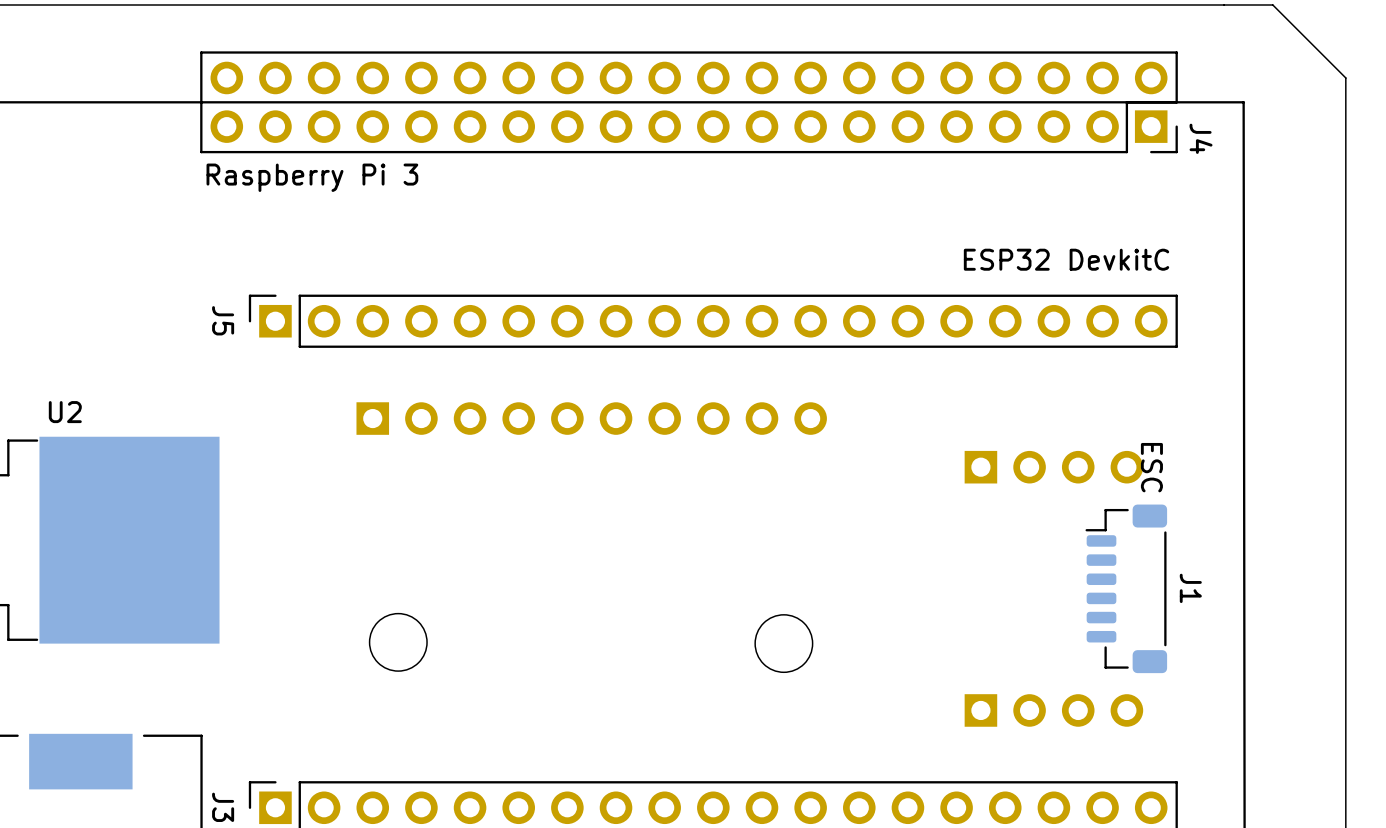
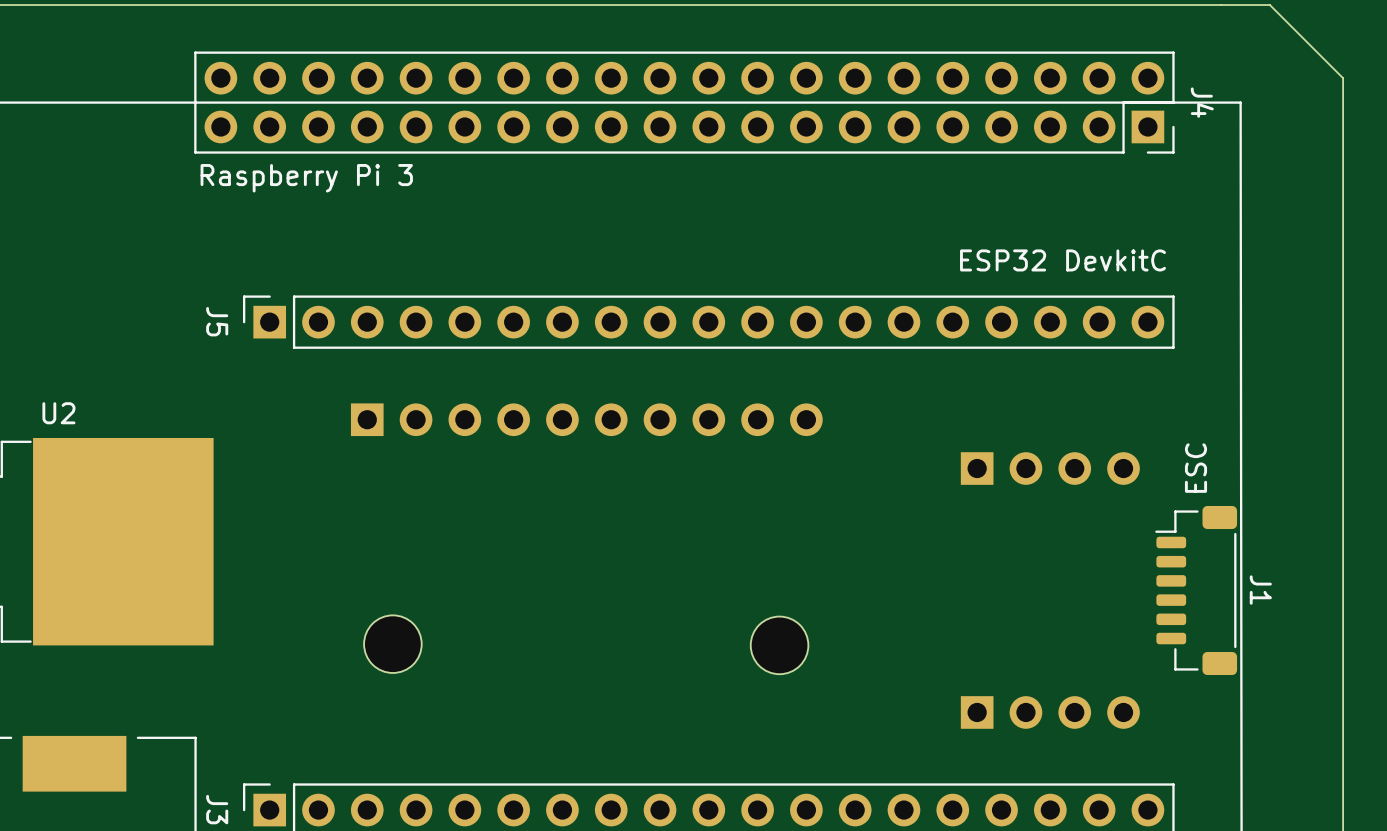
J4 name position: J4 (1201, 138) -> J4 (1202, 102)
text rotation: 0° (1151, 467) -> 180° (1196, 468)
J1 position: (1126, 588) -> (1196, 590)

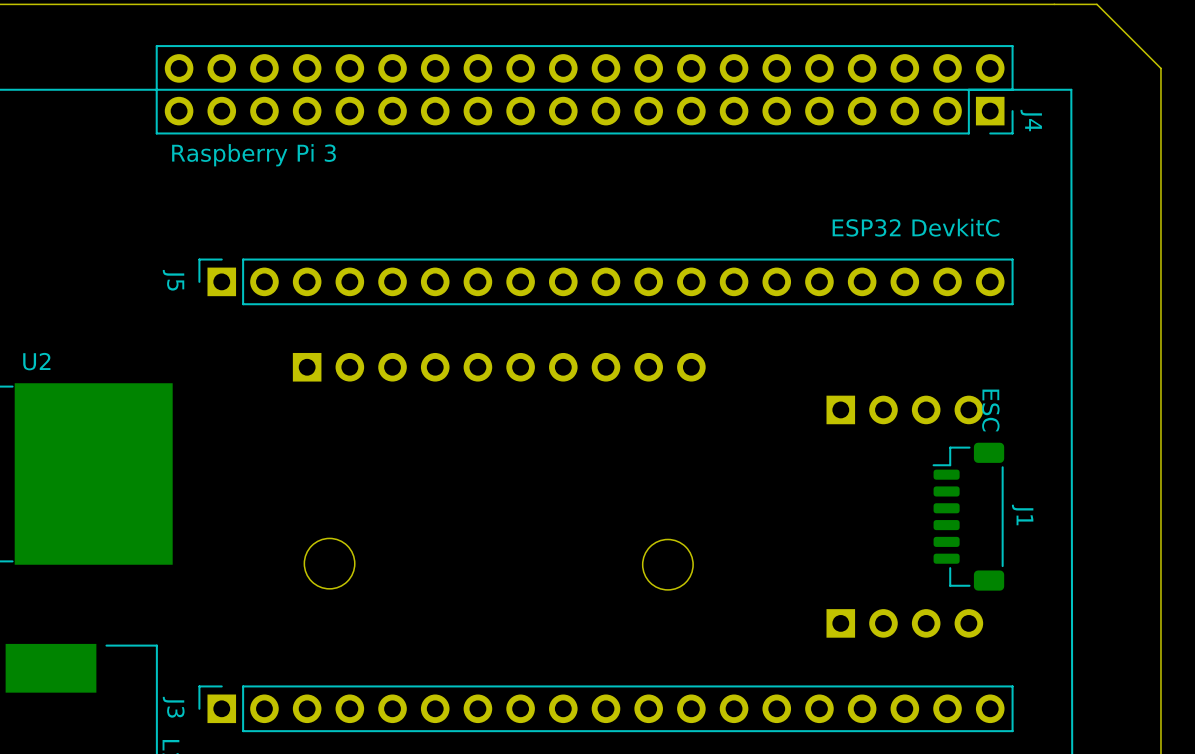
J4 name position: J4 (1202, 102) -> J4 (1031, 120)
text rotation: 0° (1196, 468) -> 180° (990, 410)
J1 position: (1196, 590) -> (968, 516)

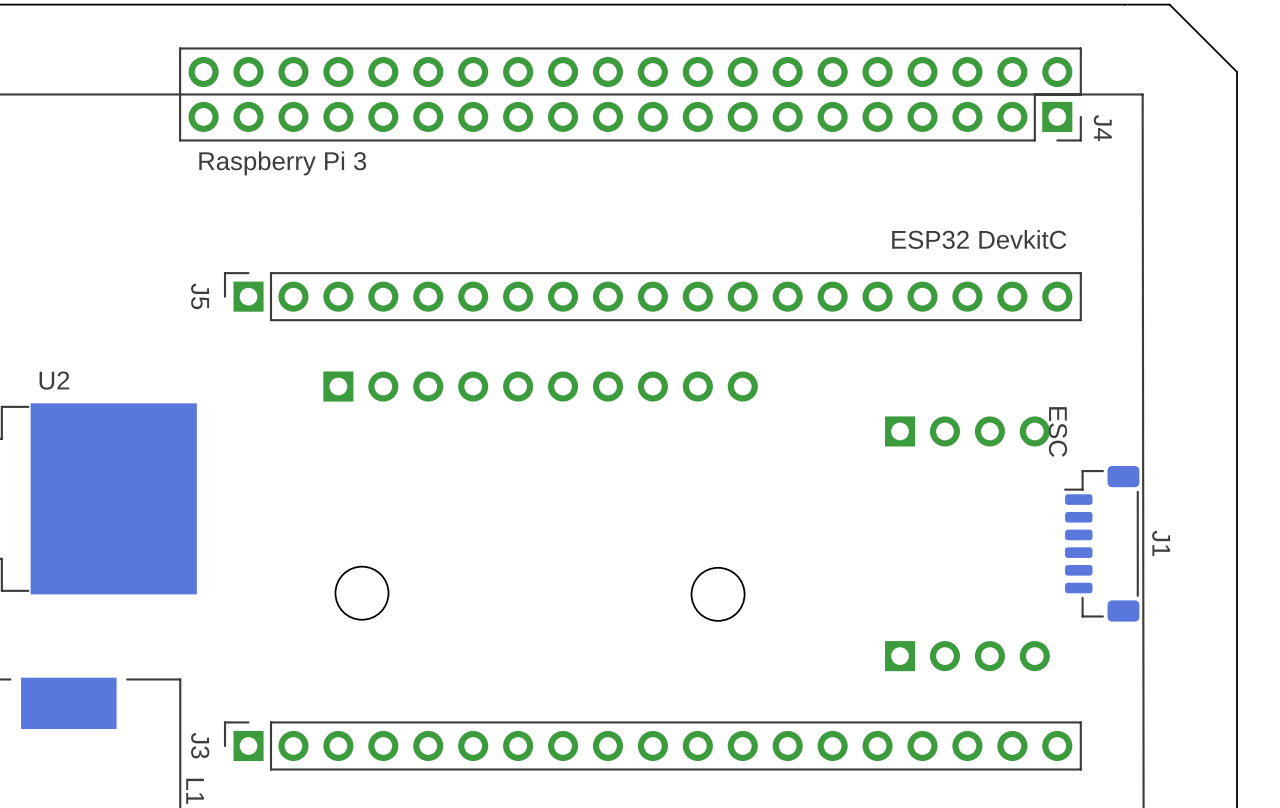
J1 position: (968, 516) -> (1101, 543)

